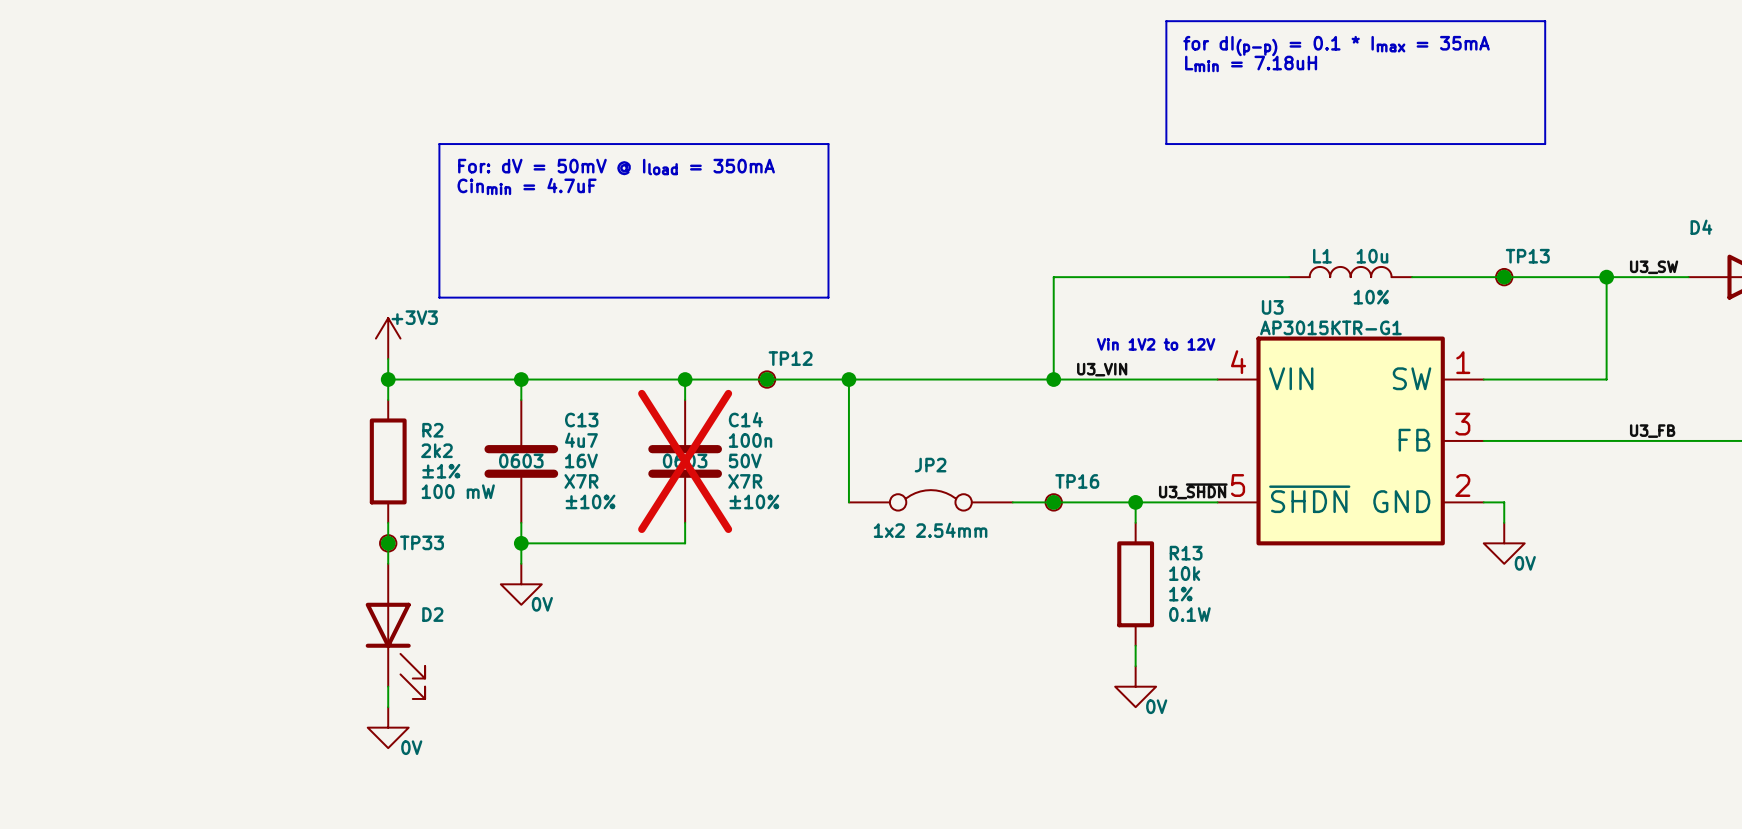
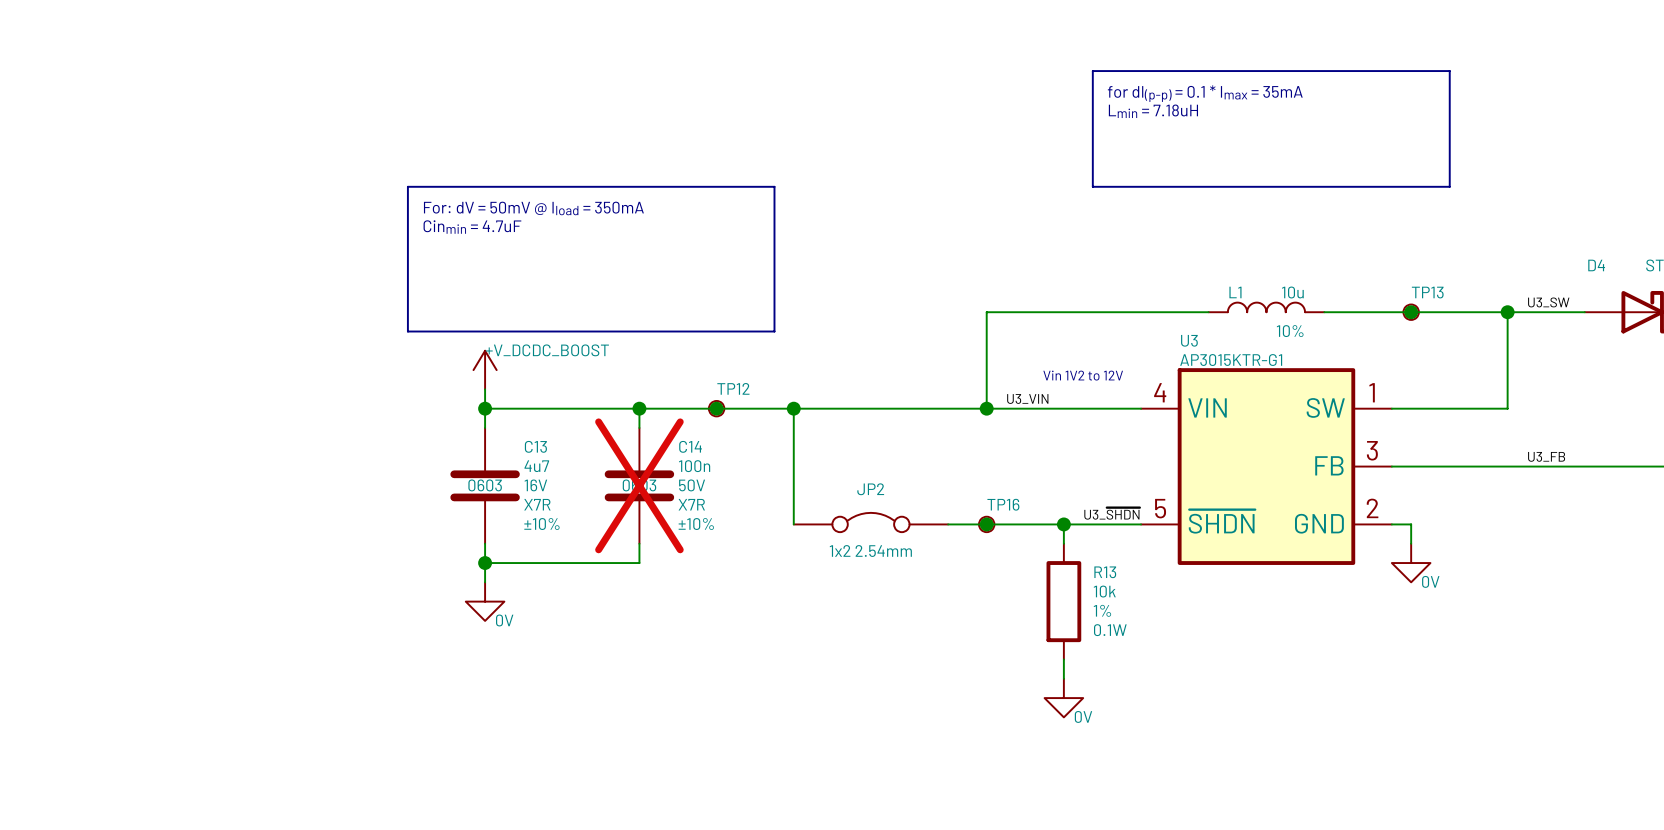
power symbol: +3V3 (388, 338) -> none
power symbol: none -> +V_DCDC_BOOST (485, 370)
wire: (388, 359) (388, 400) -> none
wire: (388, 379) (521, 379) -> (485, 389) (485, 408)
junction: (388, 379) -> none
R2: 2k2 (388, 461) -> none
wire: (388, 522) (388, 563) -> none
junction: (388, 543) -> none
TP33: (388, 543) -> none
D2: (395, 631) -> none
wire: (388, 686) (388, 707) -> none
power symbol: 0V (388, 727) -> none

